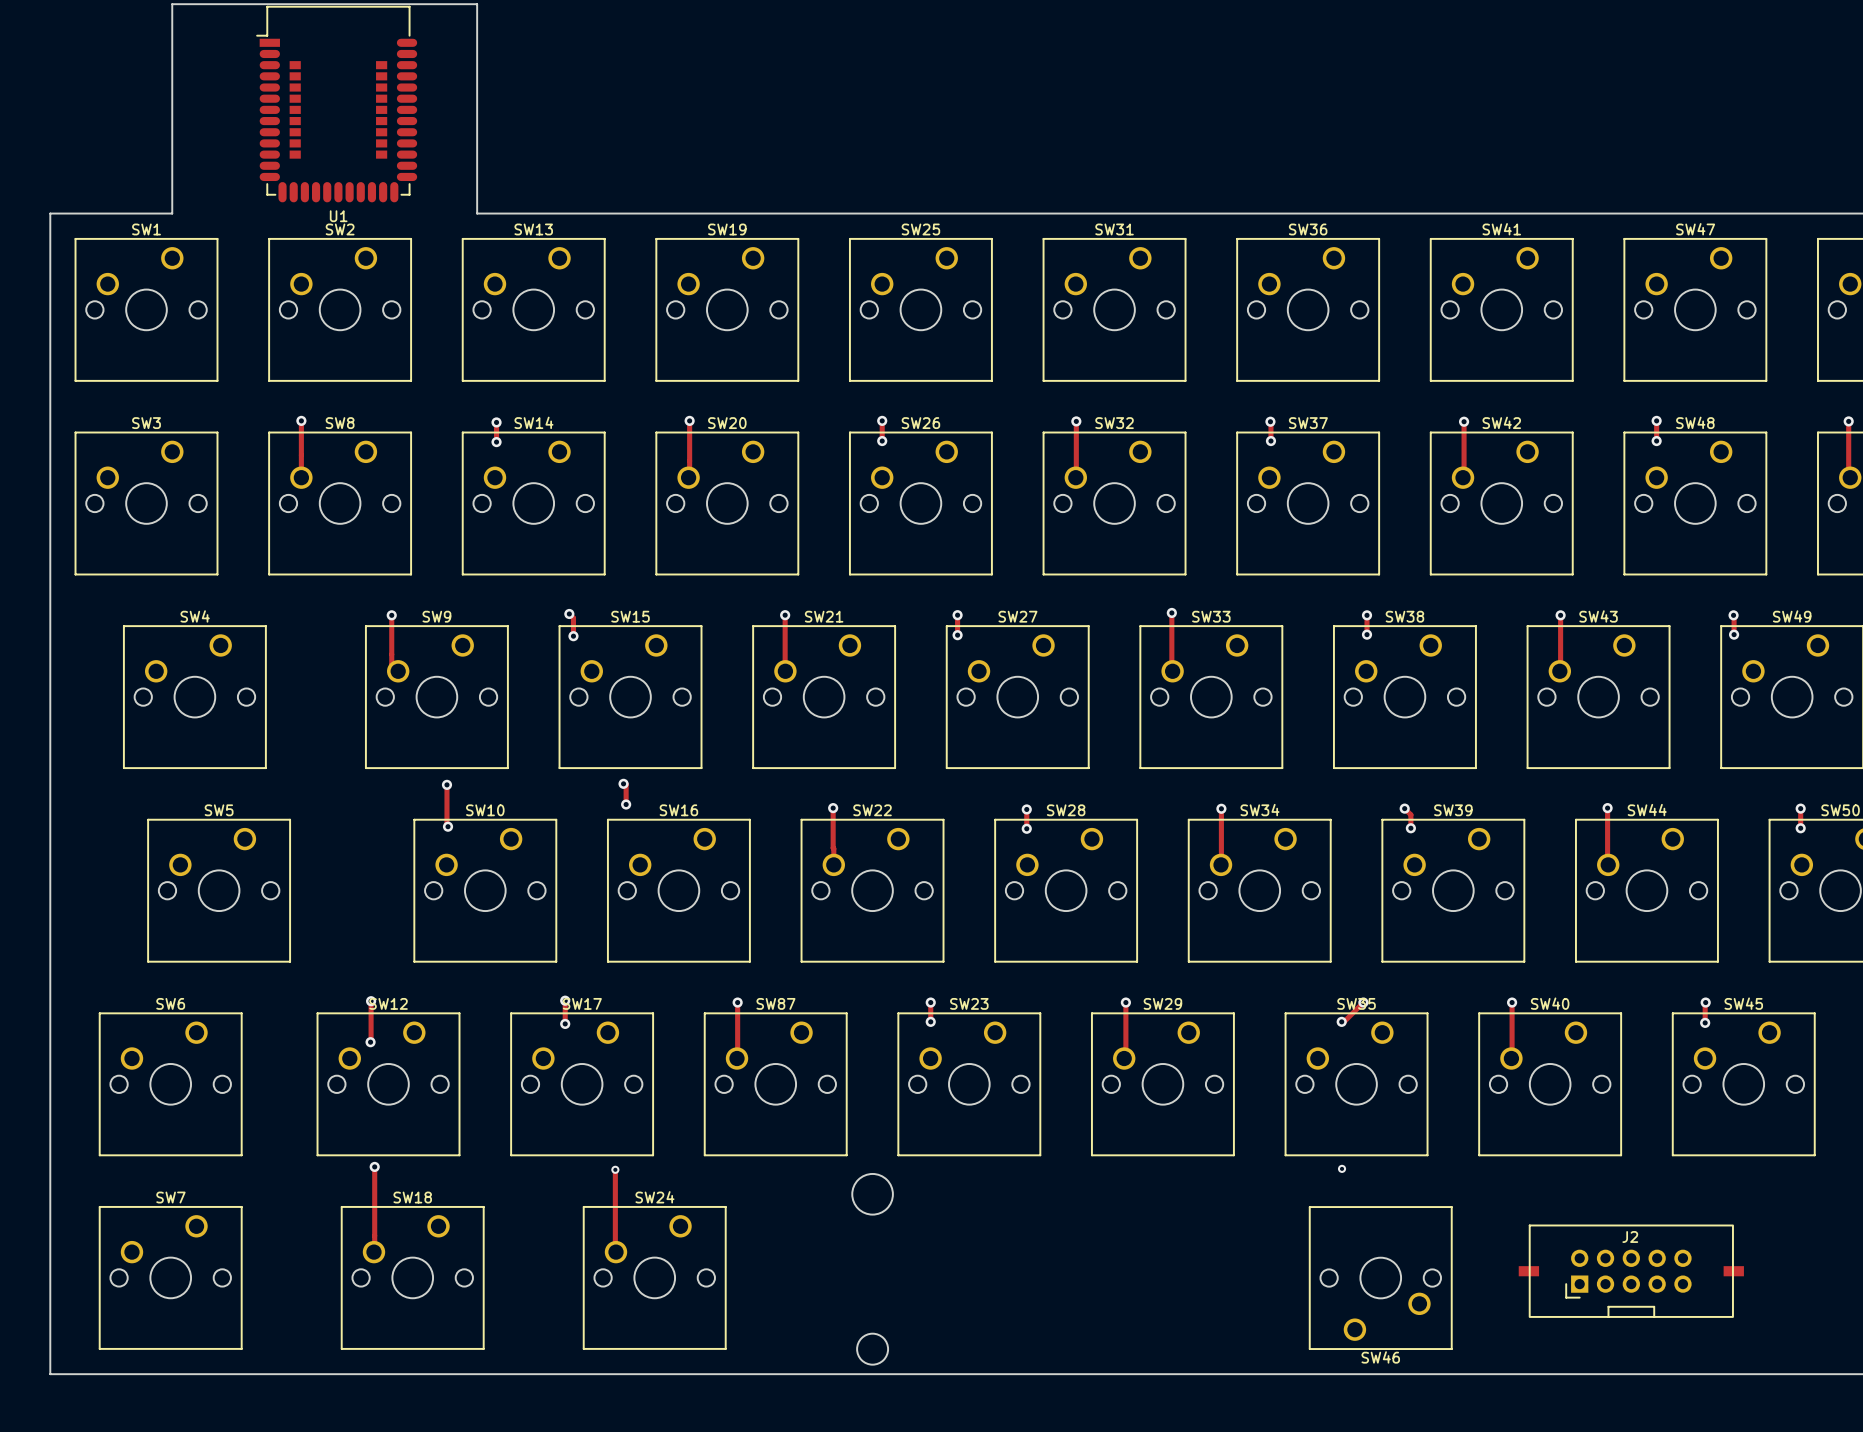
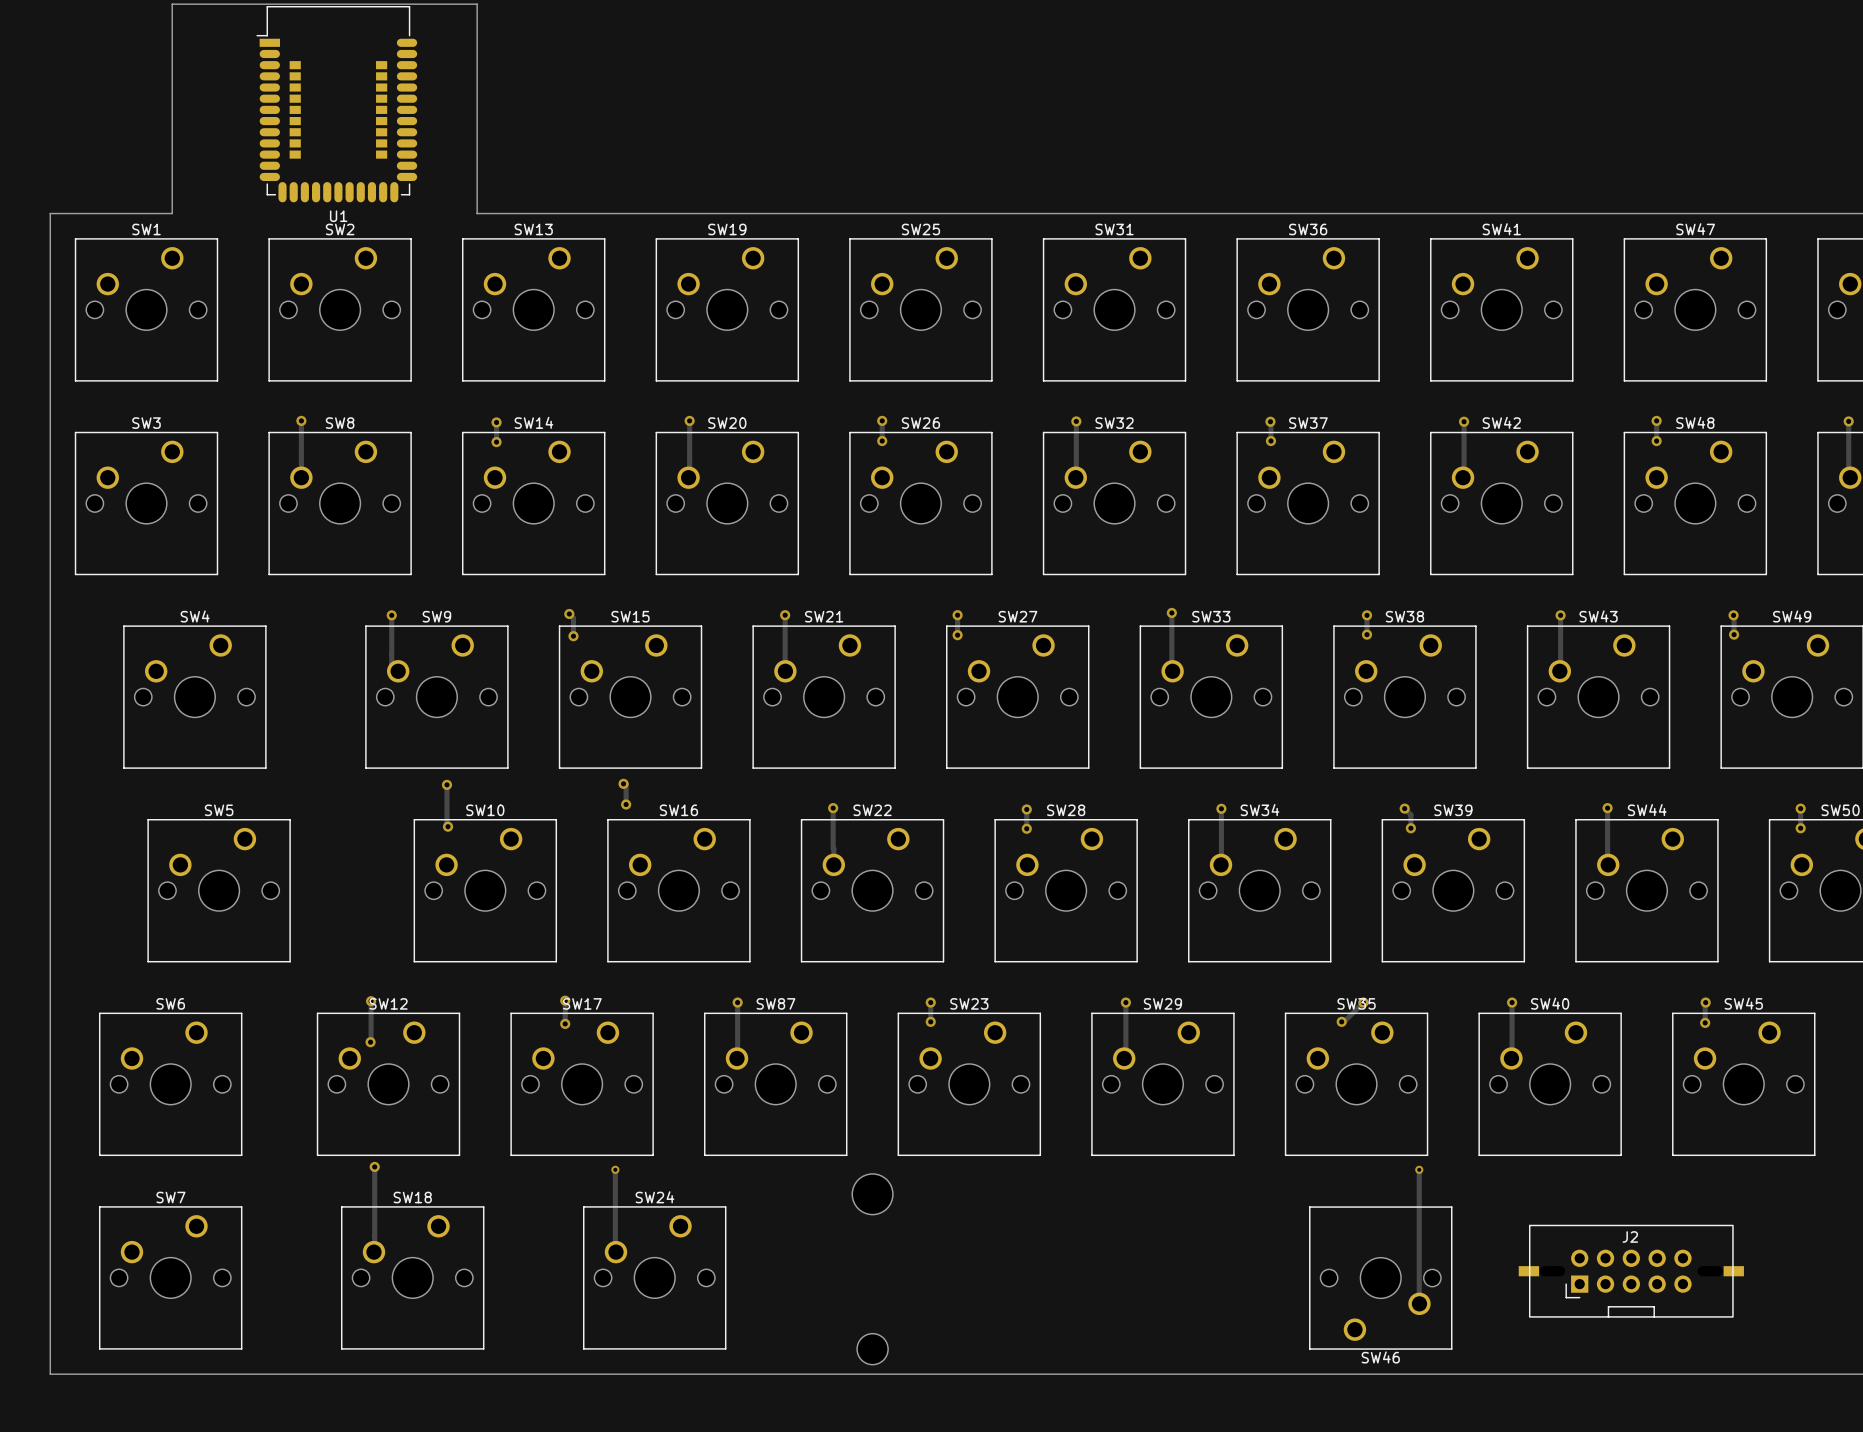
via: (1342, 1168) -> none
track: none -> (1419, 1169) (1419, 1303)
via: none -> (1419, 1169)

